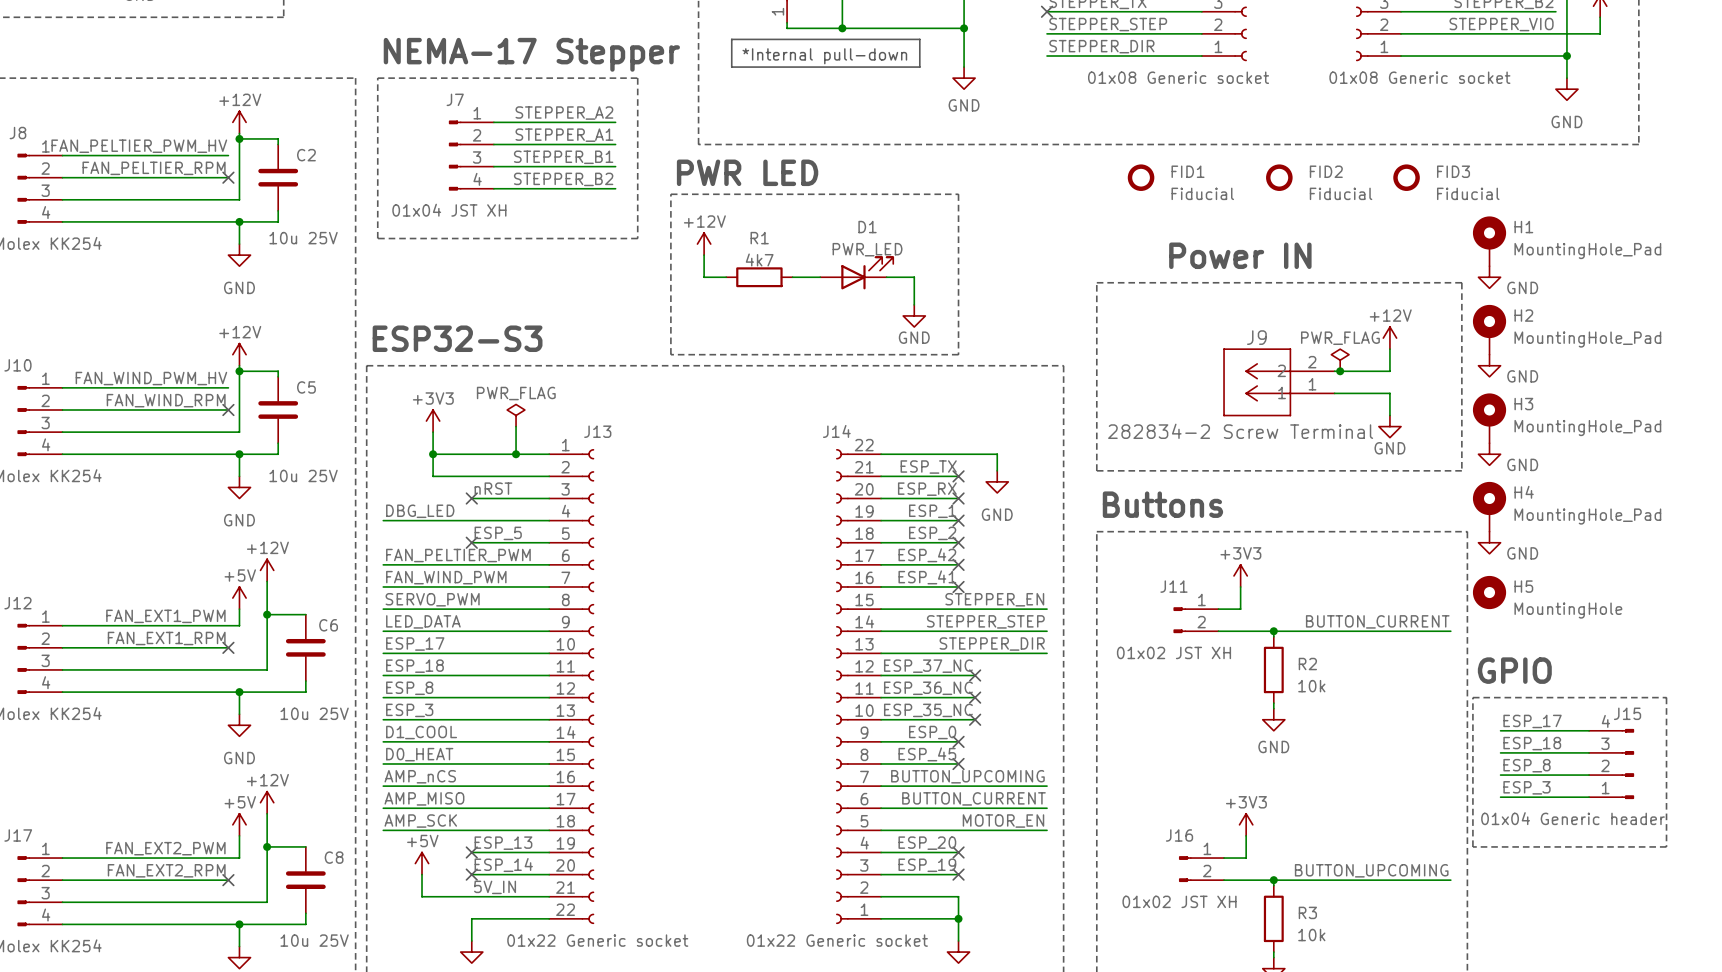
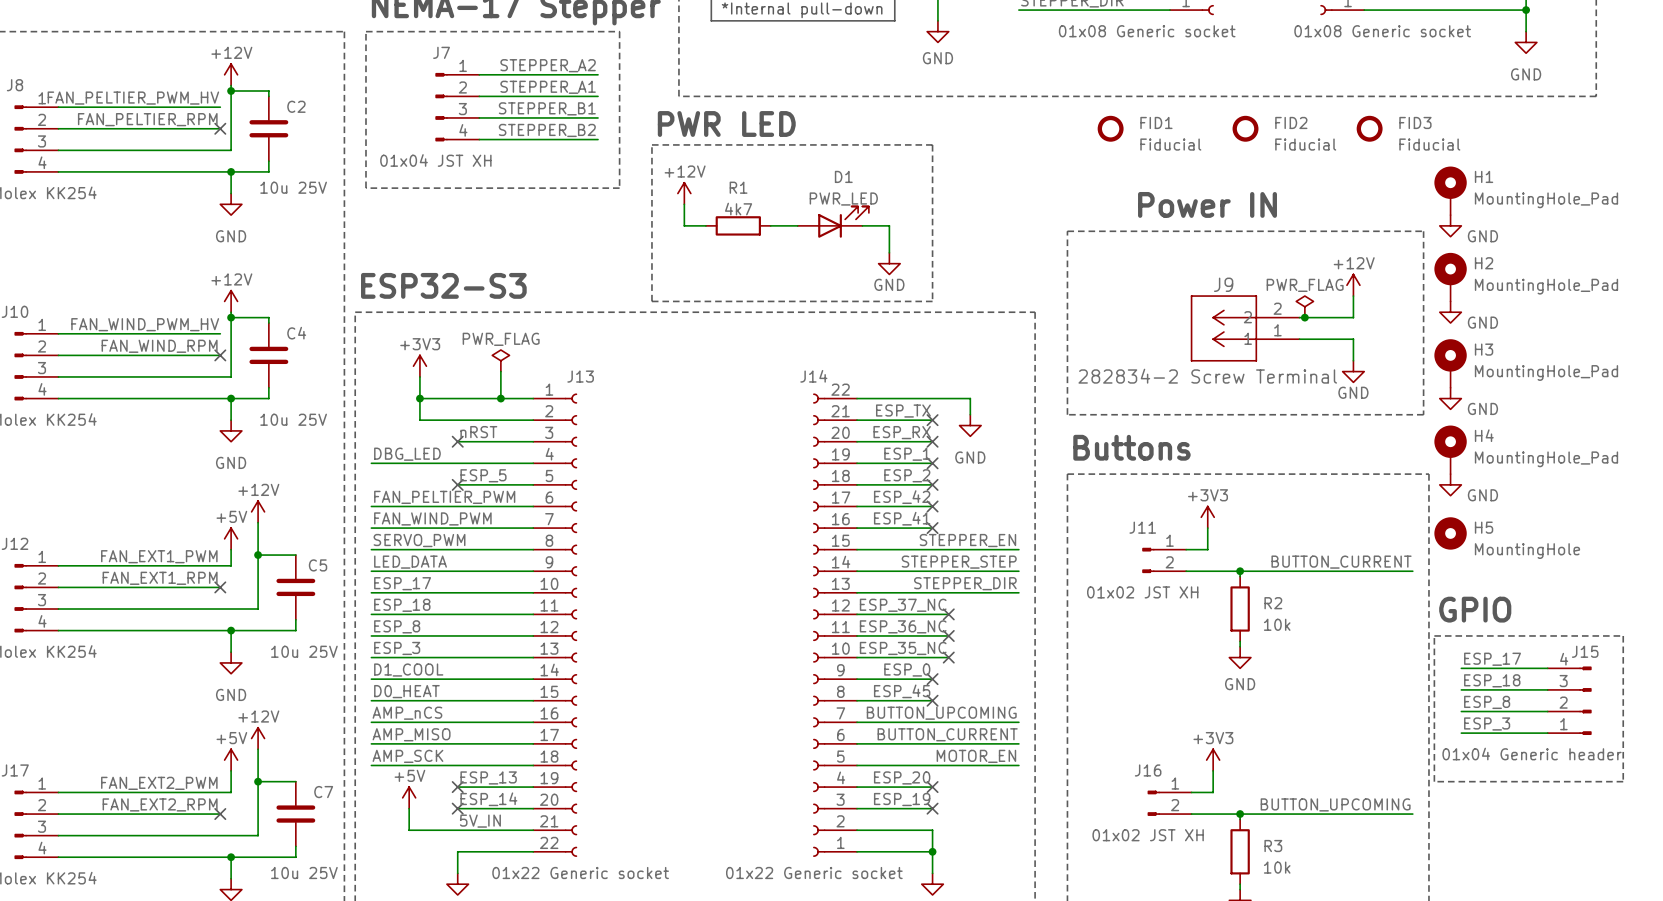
C5 name: C5 (306, 387) -> C4 (296, 333)
C6 name: C6 (328, 625) -> C5 (318, 565)
C8 name: C8 (334, 857) -> C7 (323, 792)

